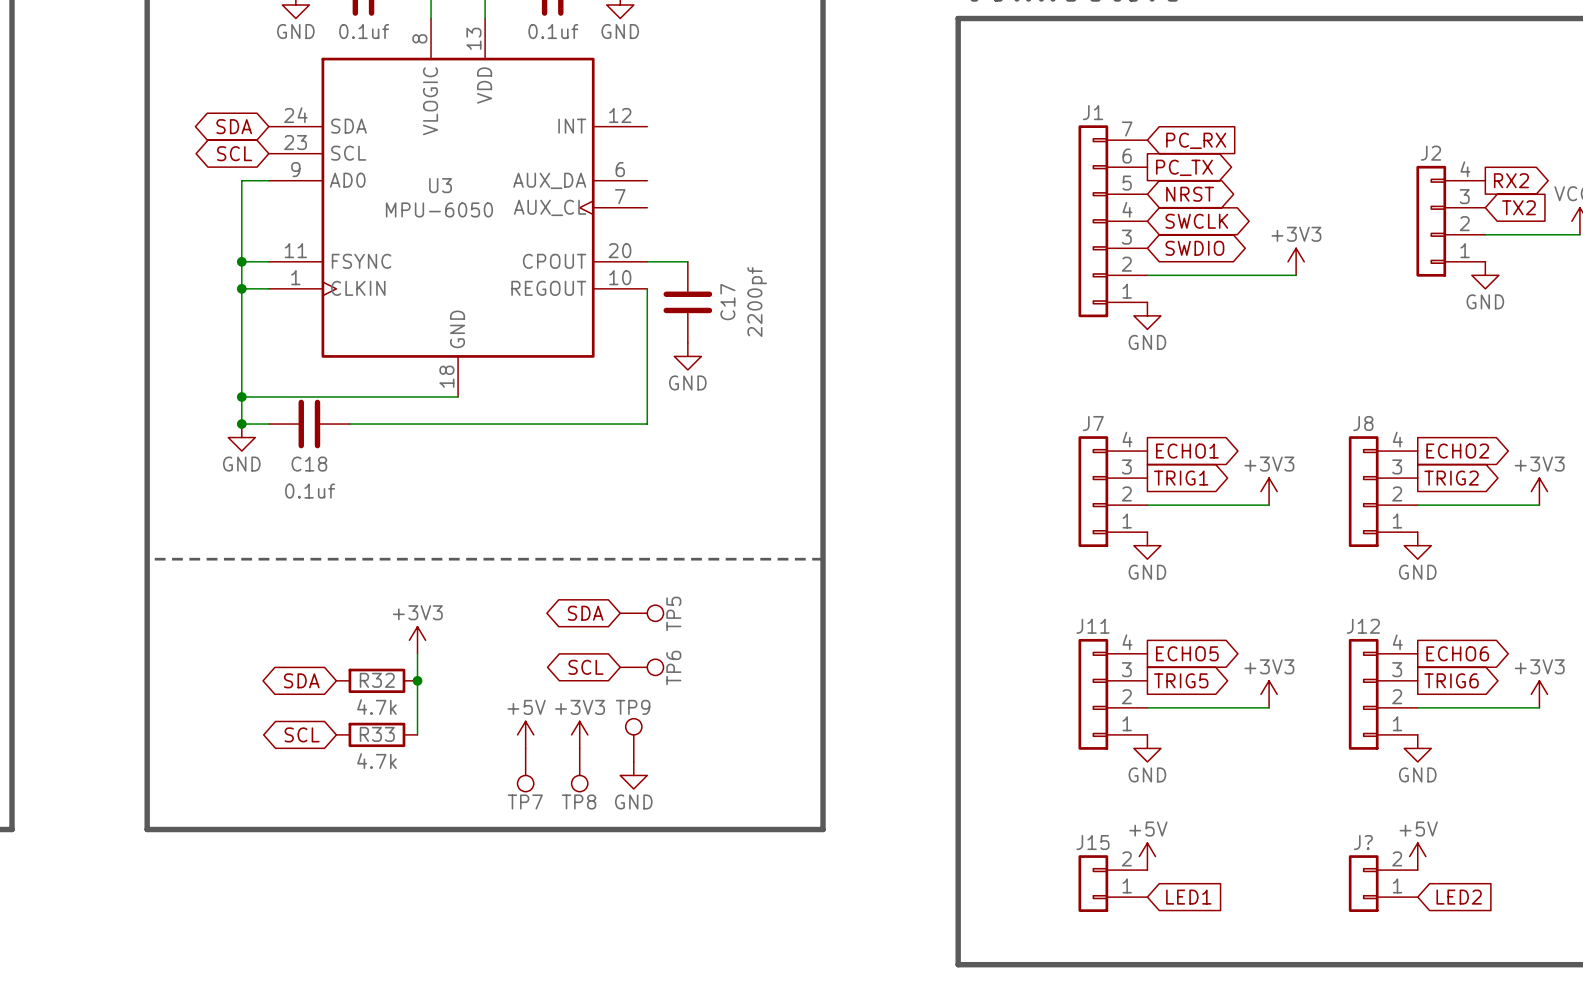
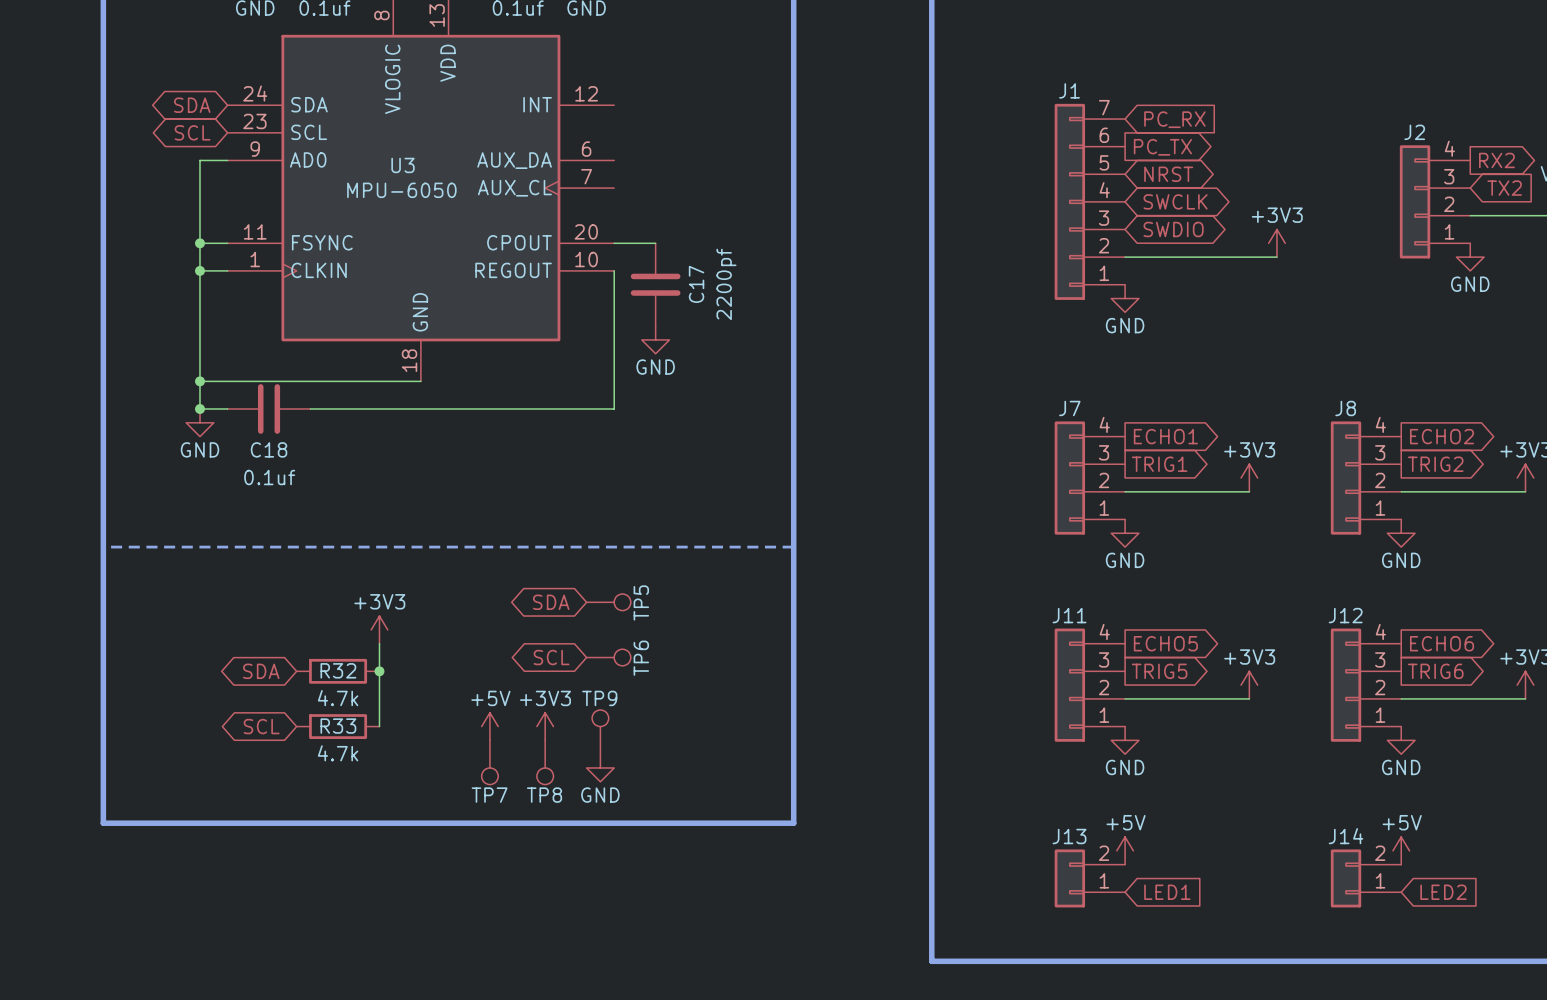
J15 name: J15 (1093, 842) -> J13 (1069, 836)
J? name: J? (1363, 842) -> J14 (1346, 836)

